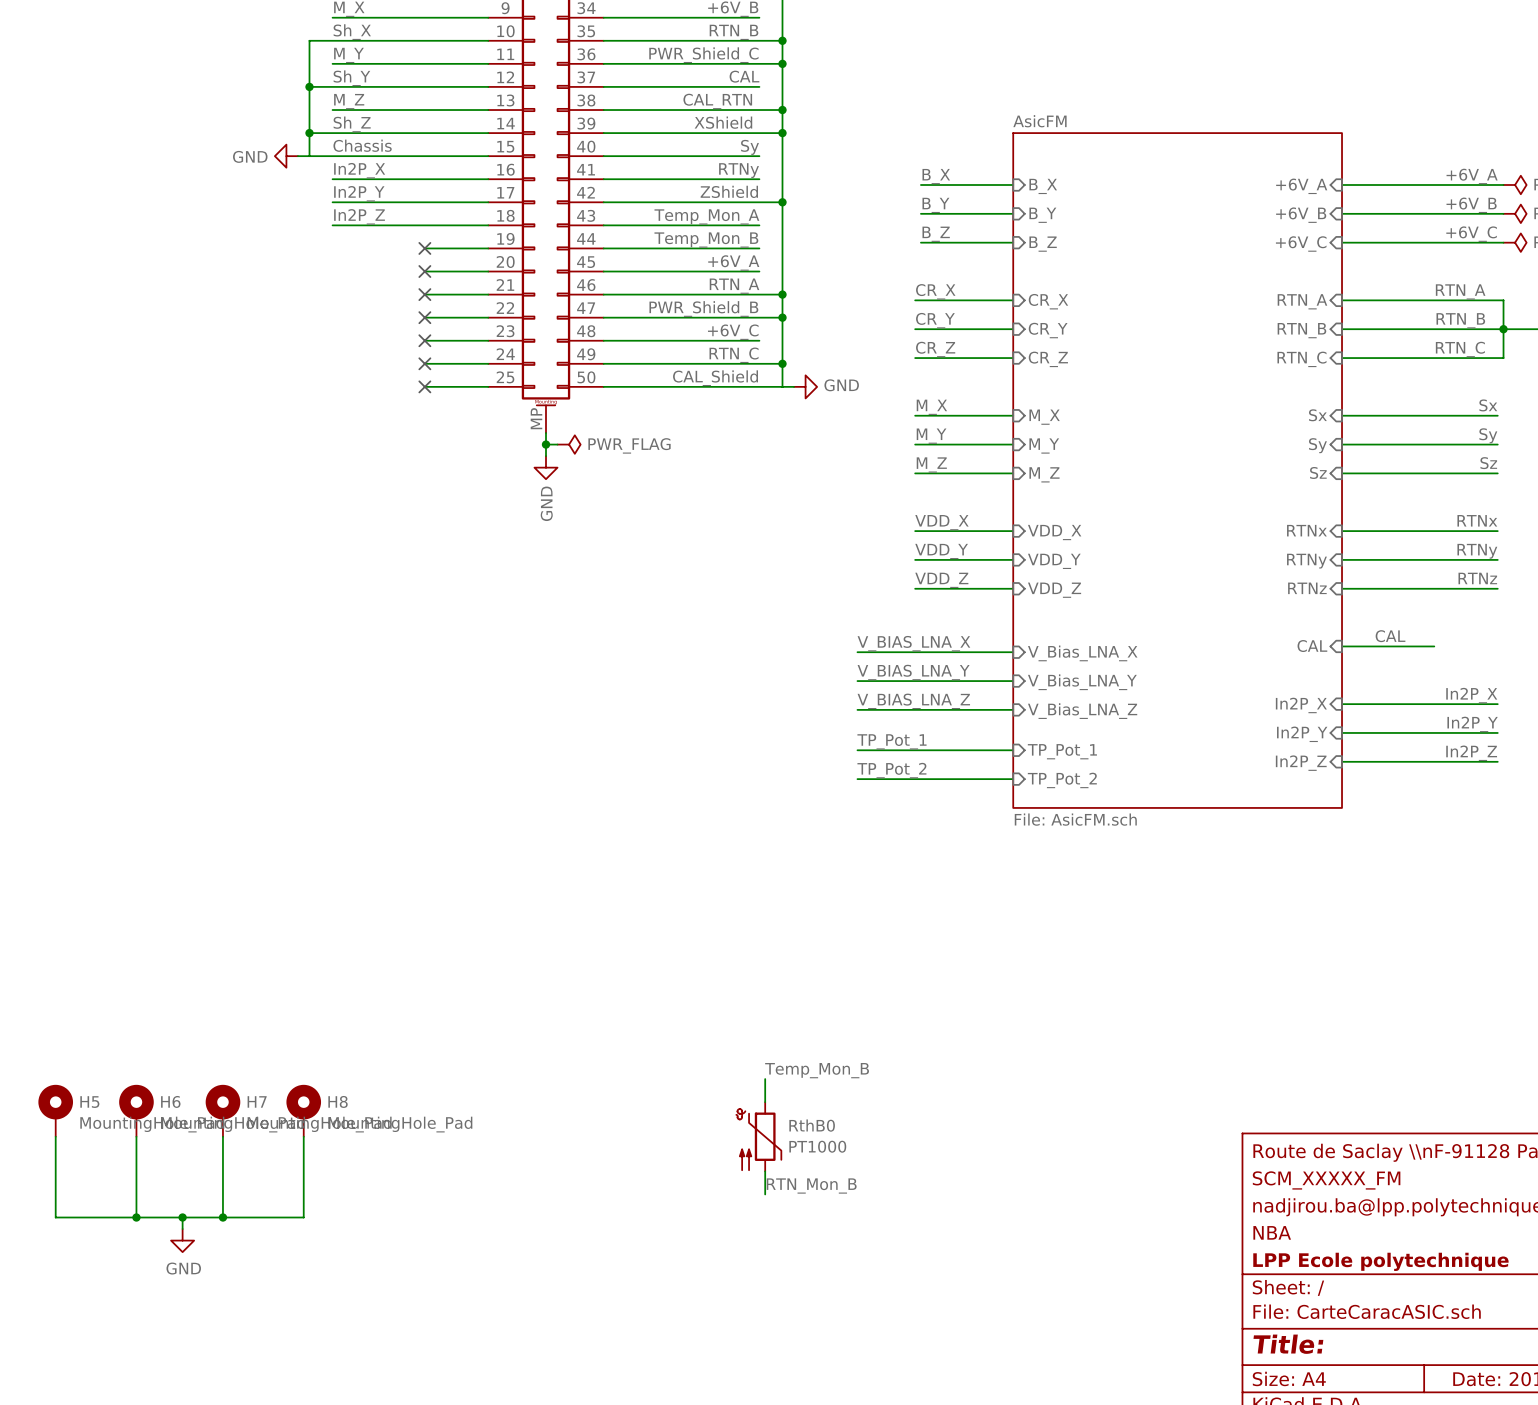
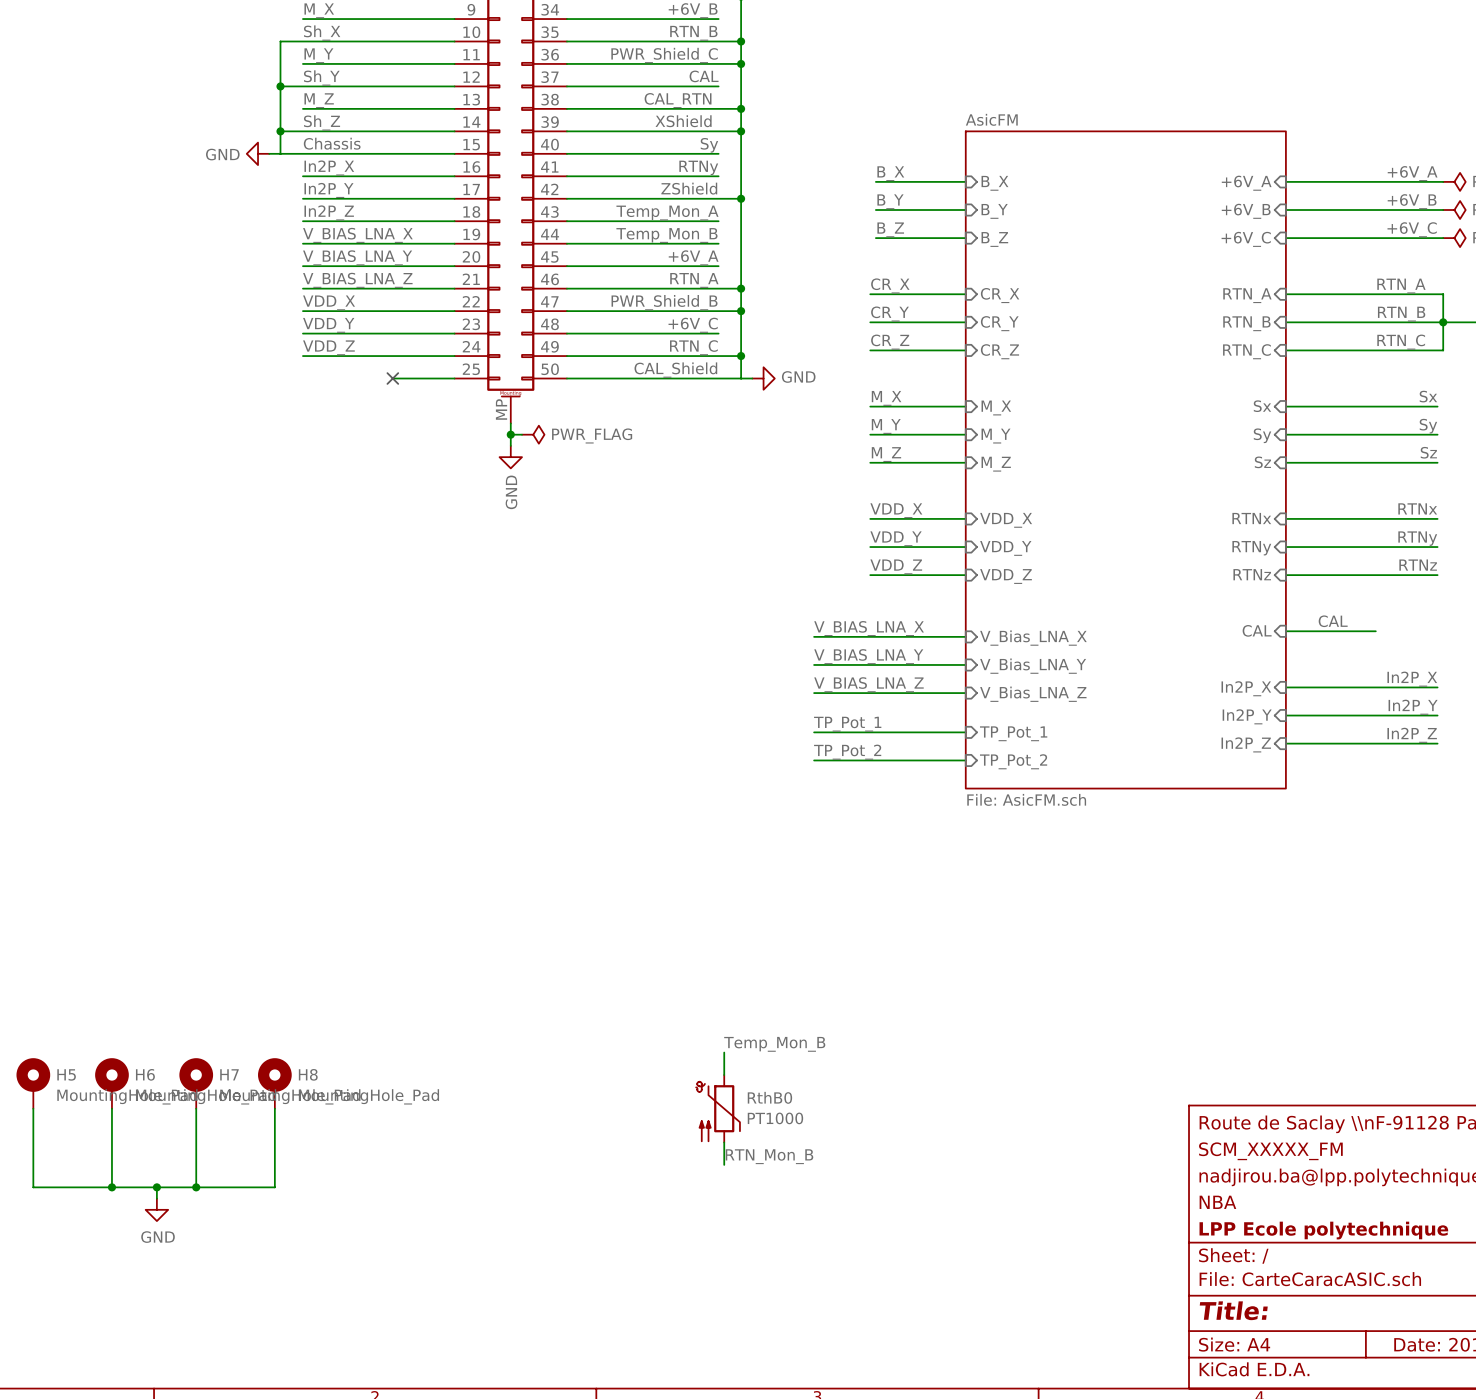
label: none -> V_BIAS_LNA_X (357, 235)
wire: none -> (302, 243) (392, 243)
no-connect mark: (424, 248) -> none
label: none -> V_BIAS_LNA_Y (357, 257)
wire: none -> (302, 266) (392, 266)
no-connect mark: (424, 271) -> none
label: none -> V_BIAS_LNA_Z (357, 280)
wire: none -> (302, 288) (392, 288)
no-connect mark: (424, 294) -> none
label: none -> VDD_X (329, 302)
wire: none -> (302, 311) (392, 311)
no-connect mark: (424, 317) -> none
label: none -> VDD_Y (328, 325)
wire: none -> (302, 333) (392, 333)
no-connect mark: (424, 340) -> none
label: none -> VDD_Z (328, 347)
wire: none -> (302, 356) (392, 356)
no-connect mark: (424, 363) -> none

